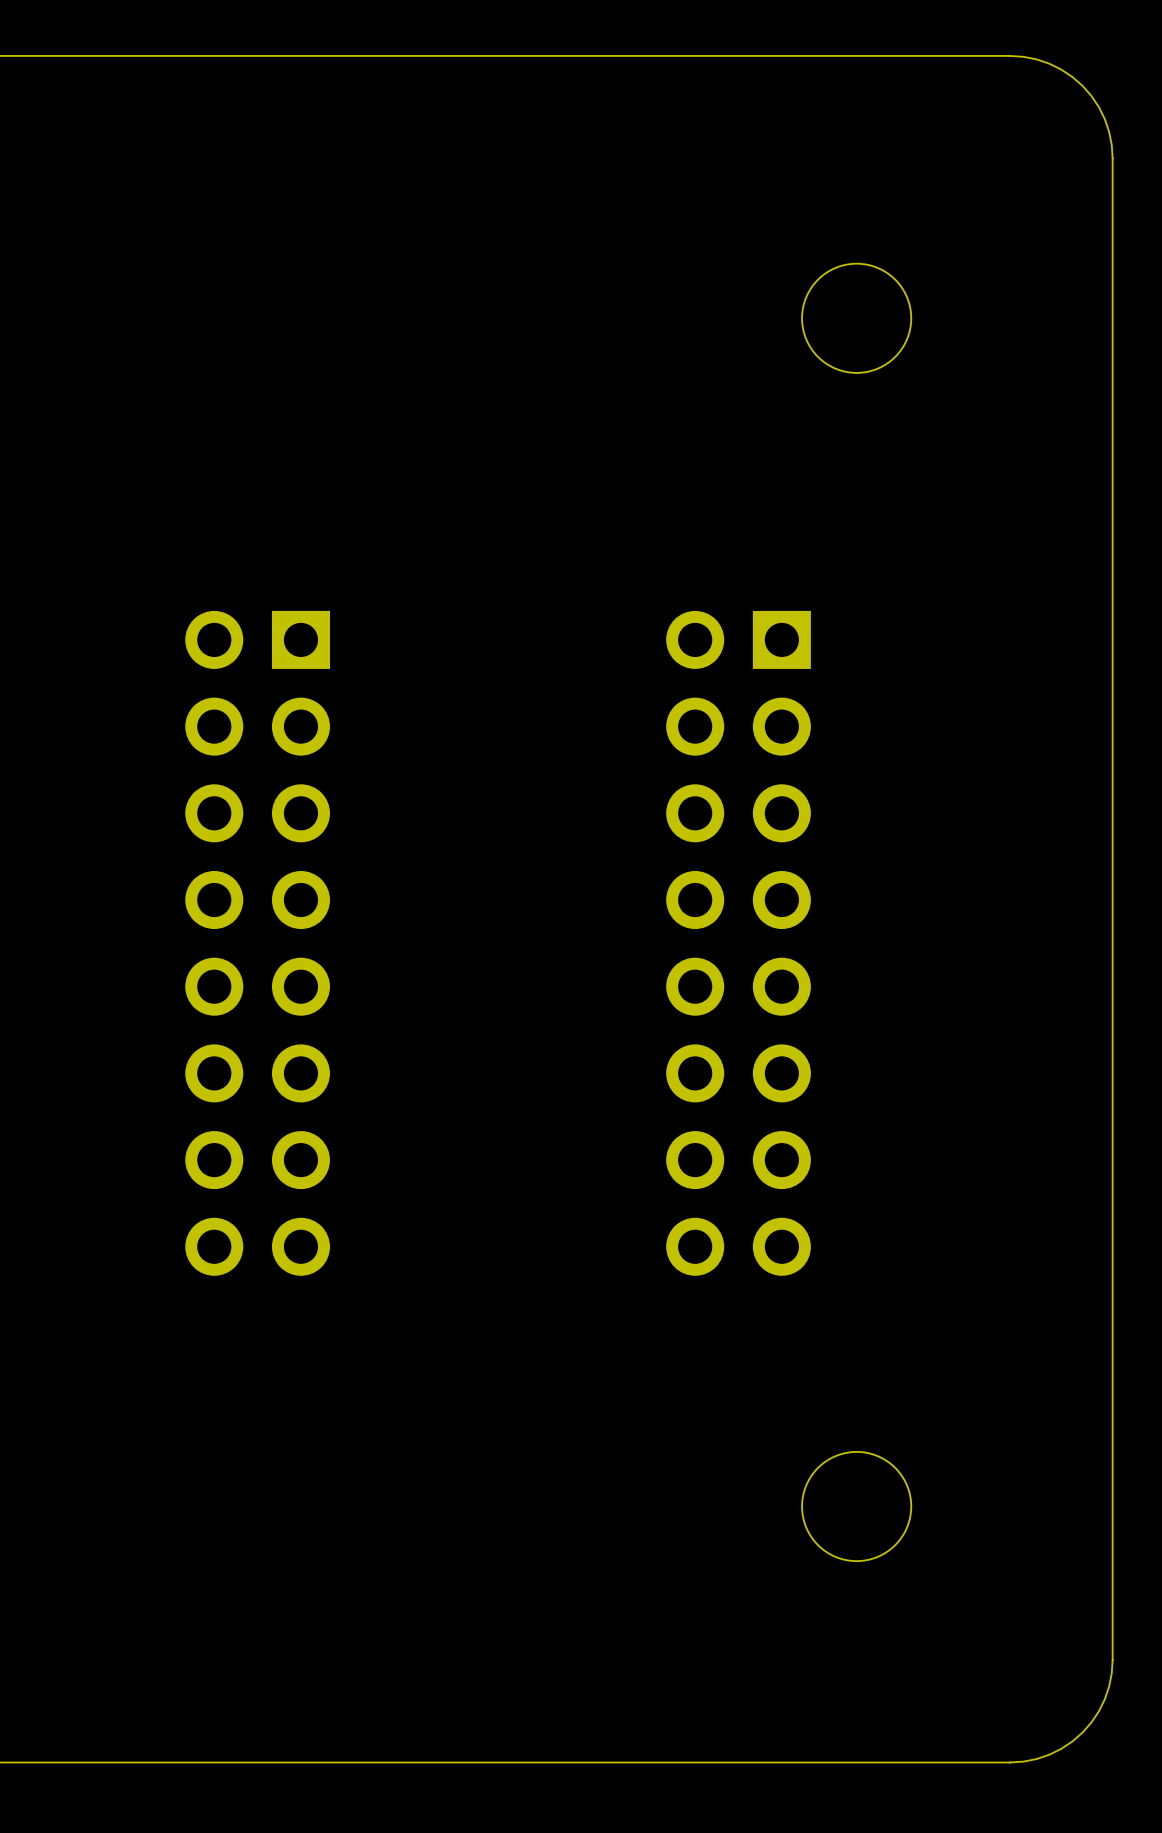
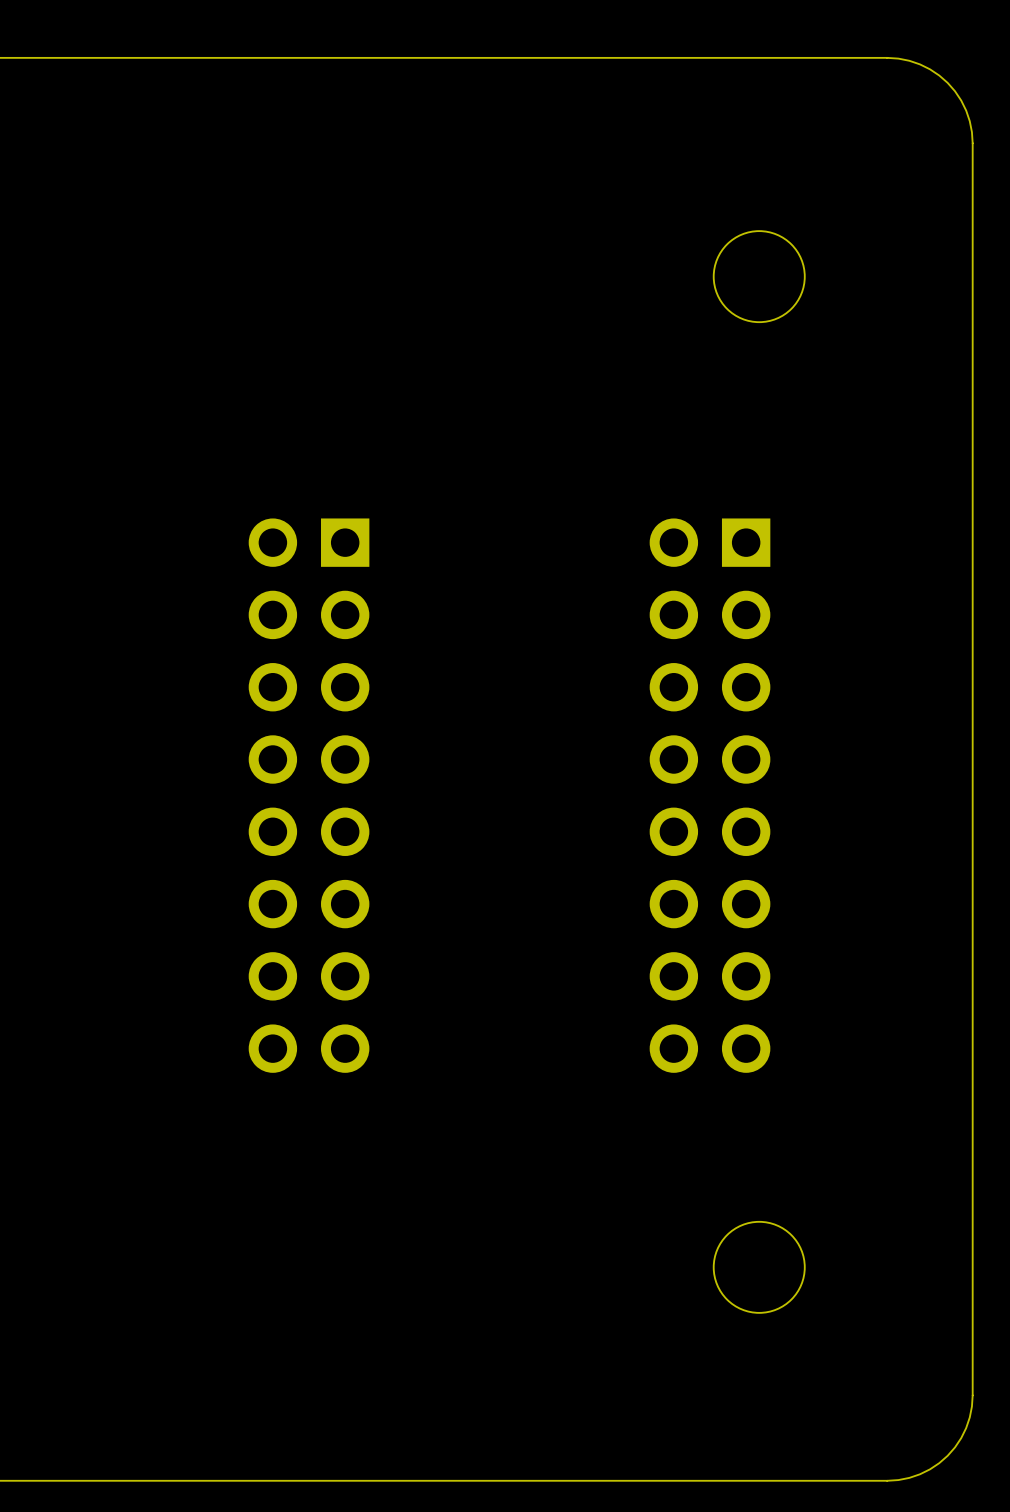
part position: (257, 943) -> (309, 795)
part position: (738, 943) -> (710, 795)

